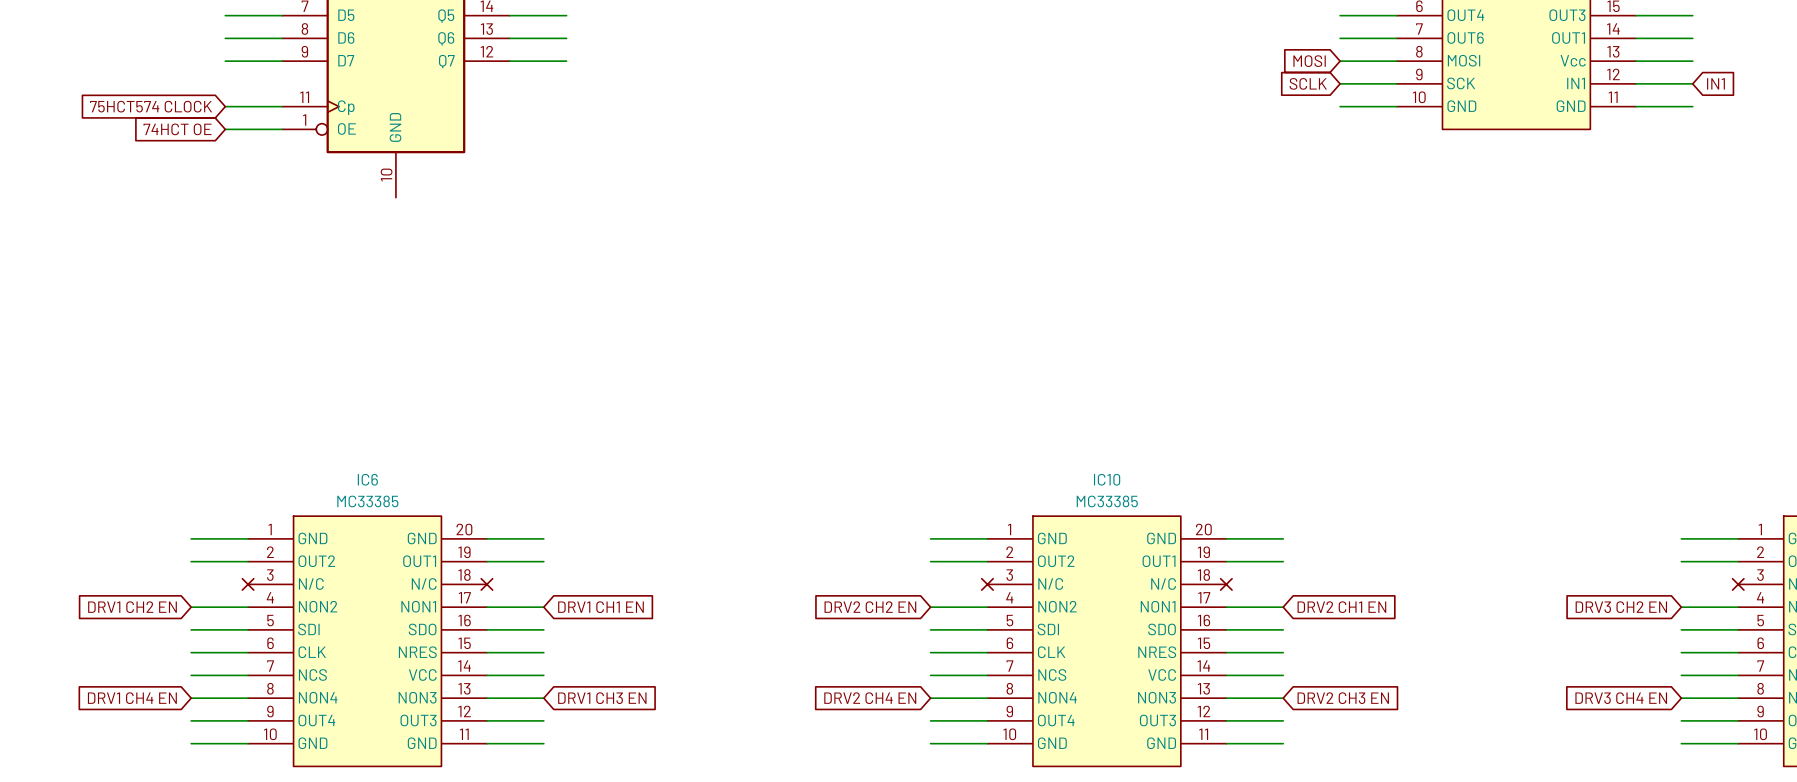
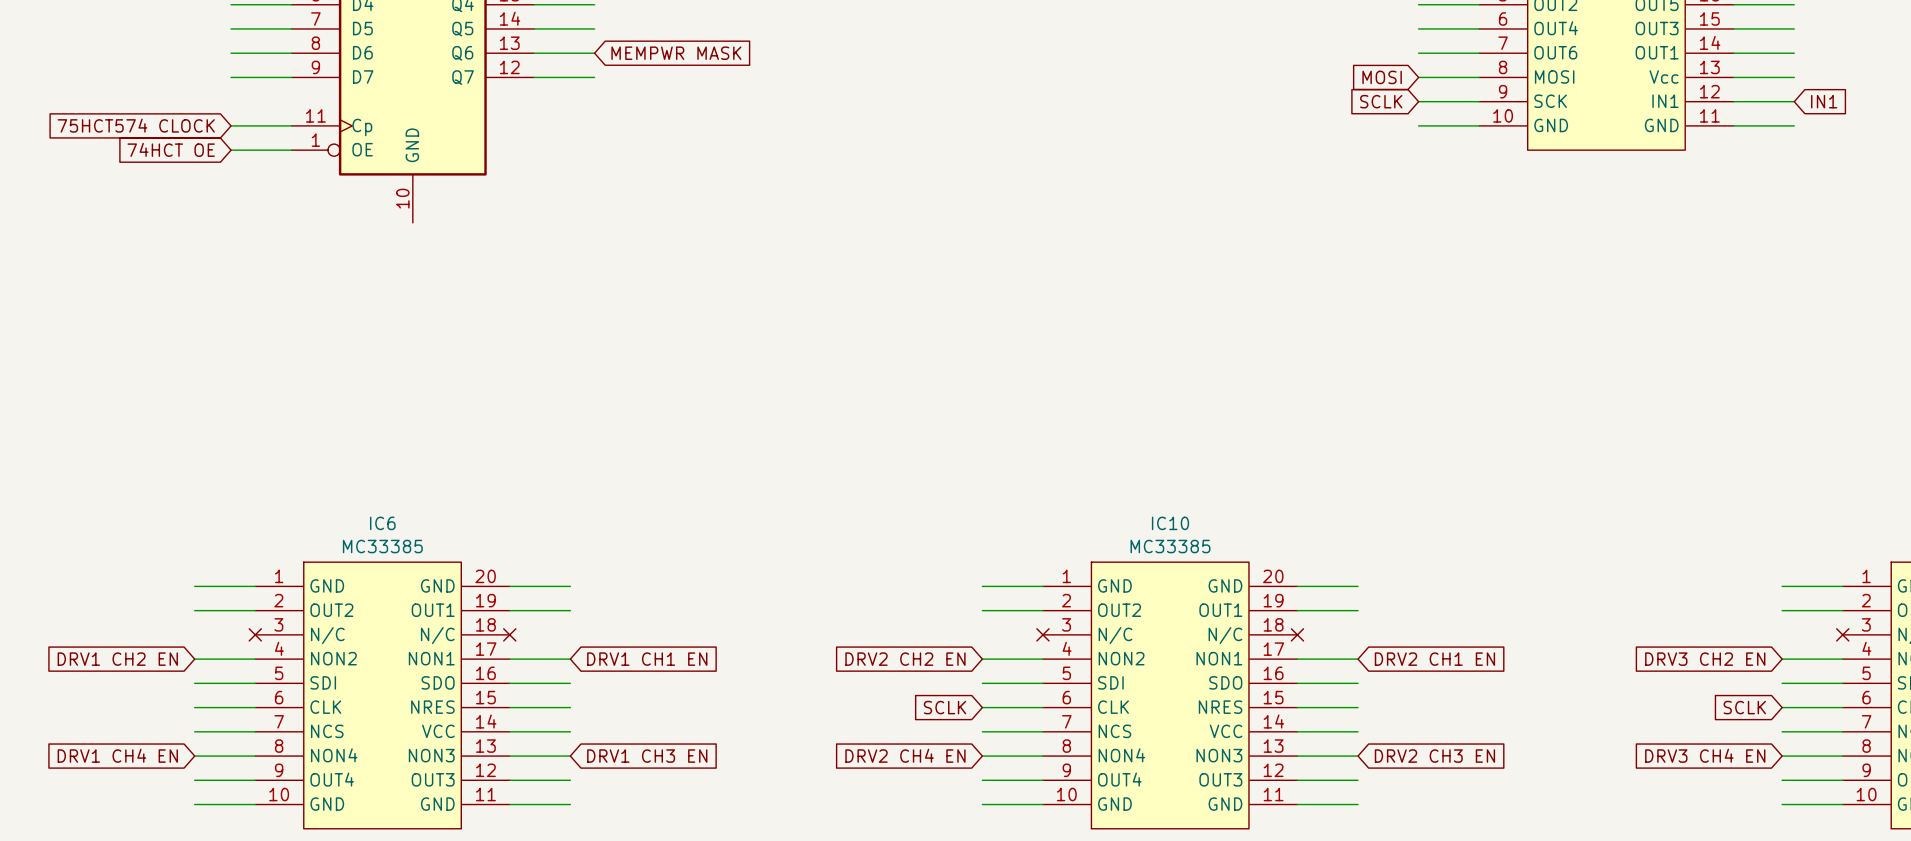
global label: none -> MEMPWR MASK (676, 53)
global label: none -> SCLK (944, 707)
global label: none -> SCLK (1744, 707)

